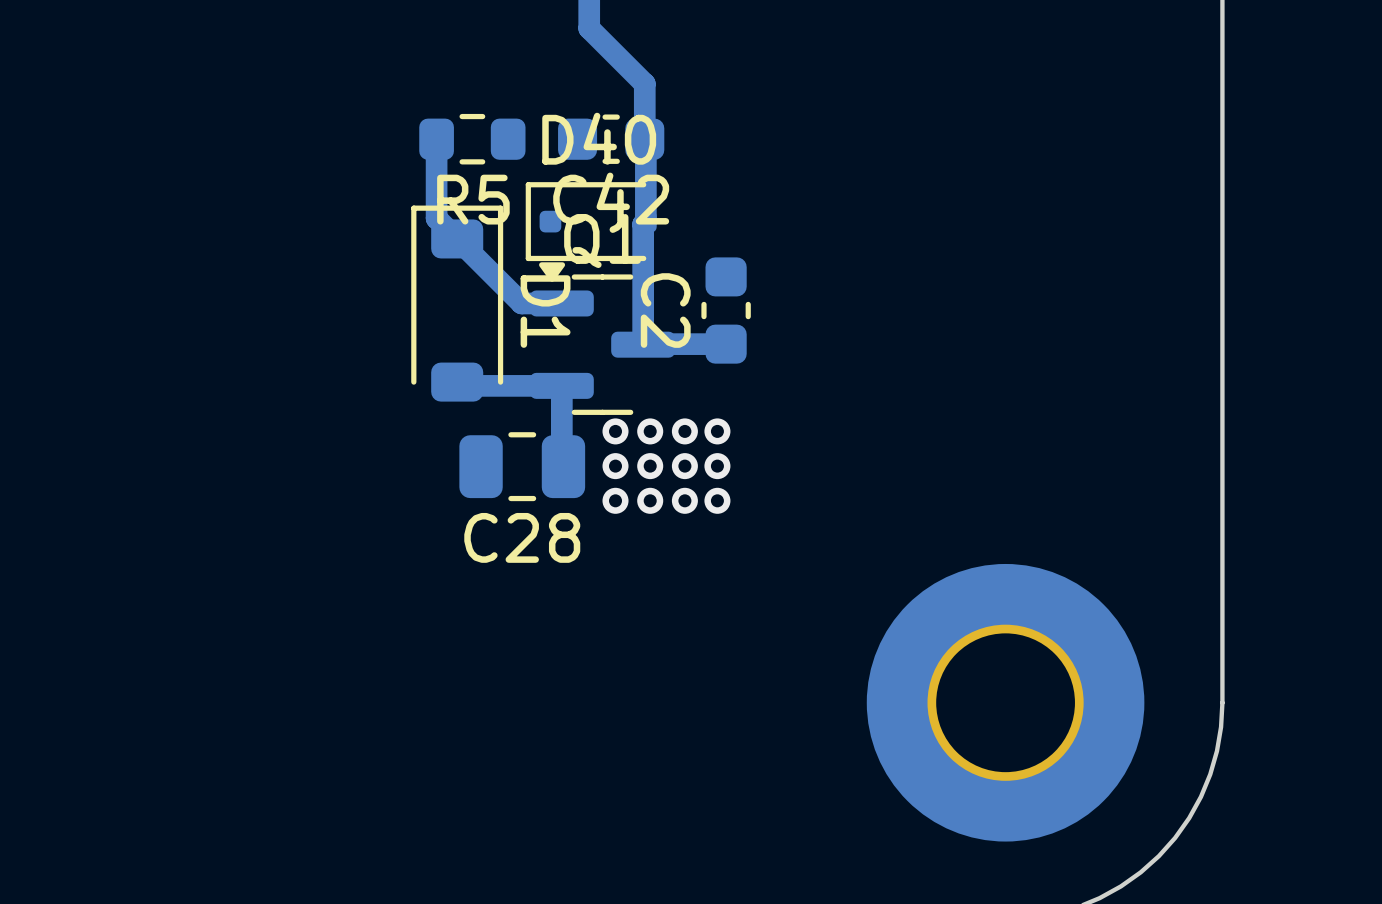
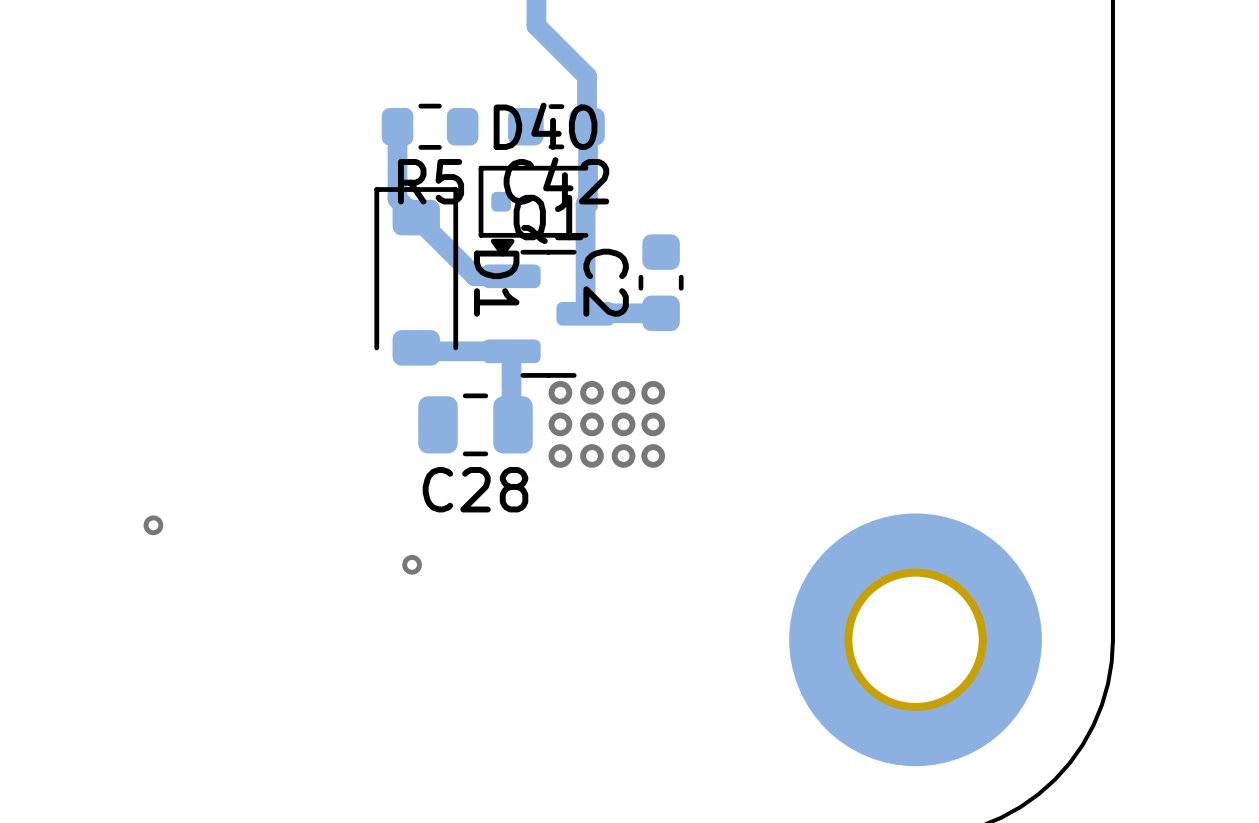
via: none -> (153, 525)
via: none -> (412, 564)

